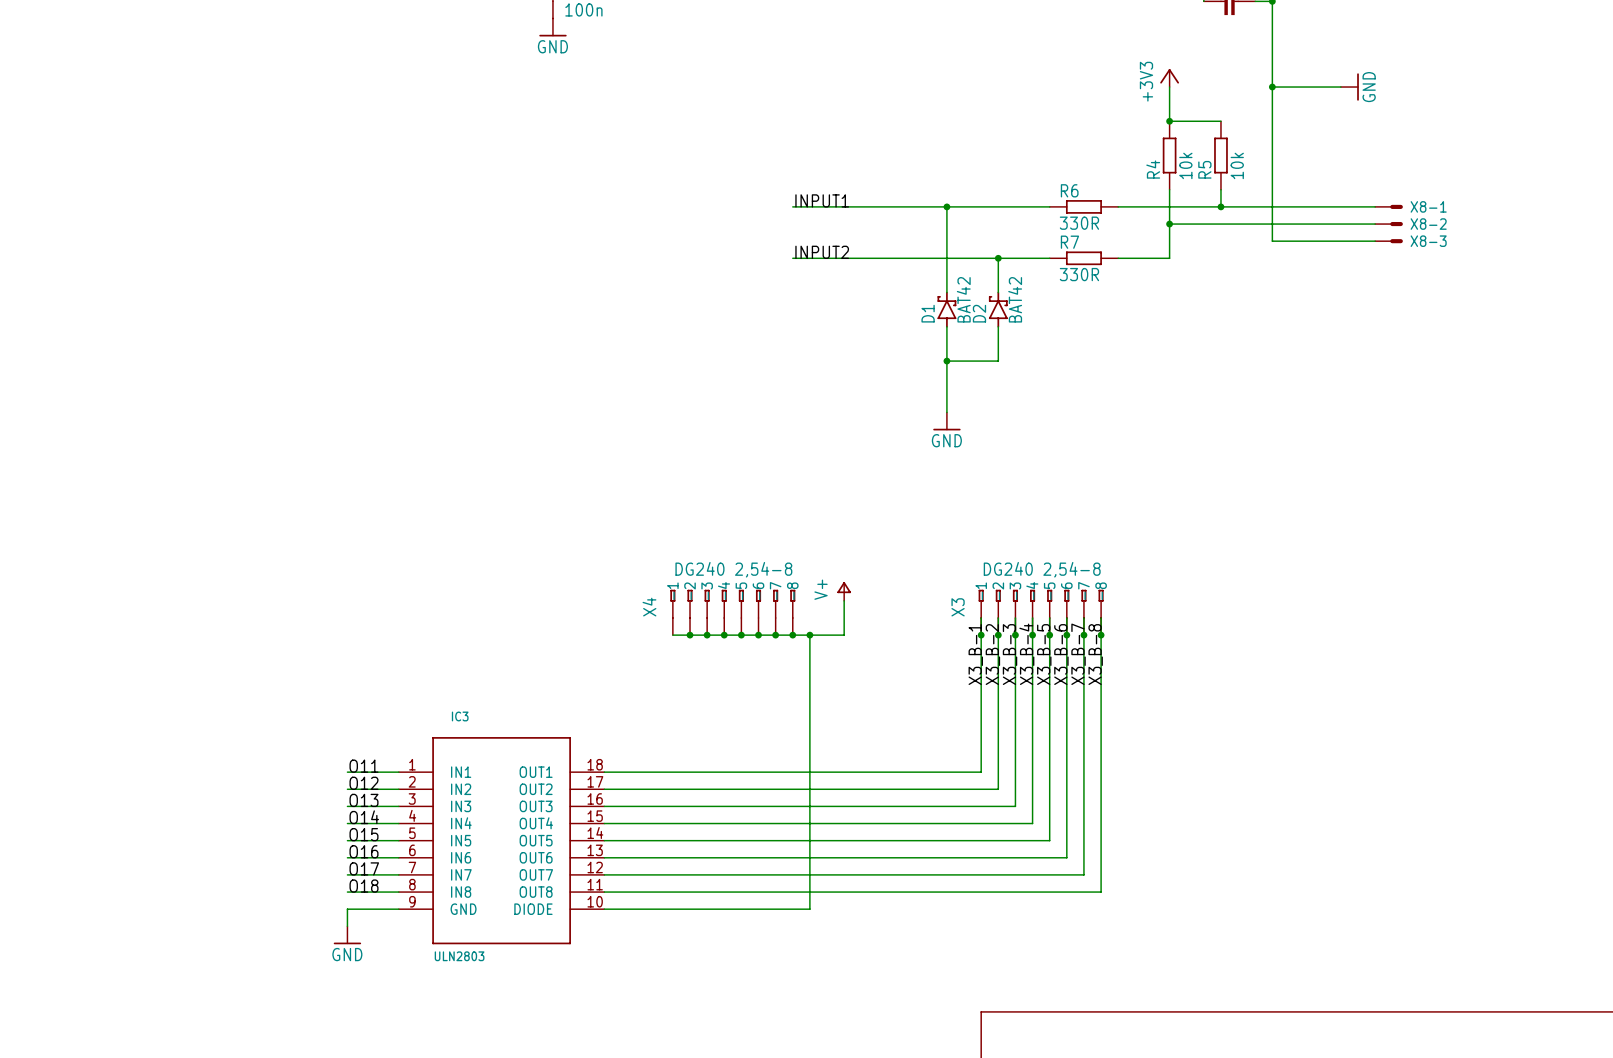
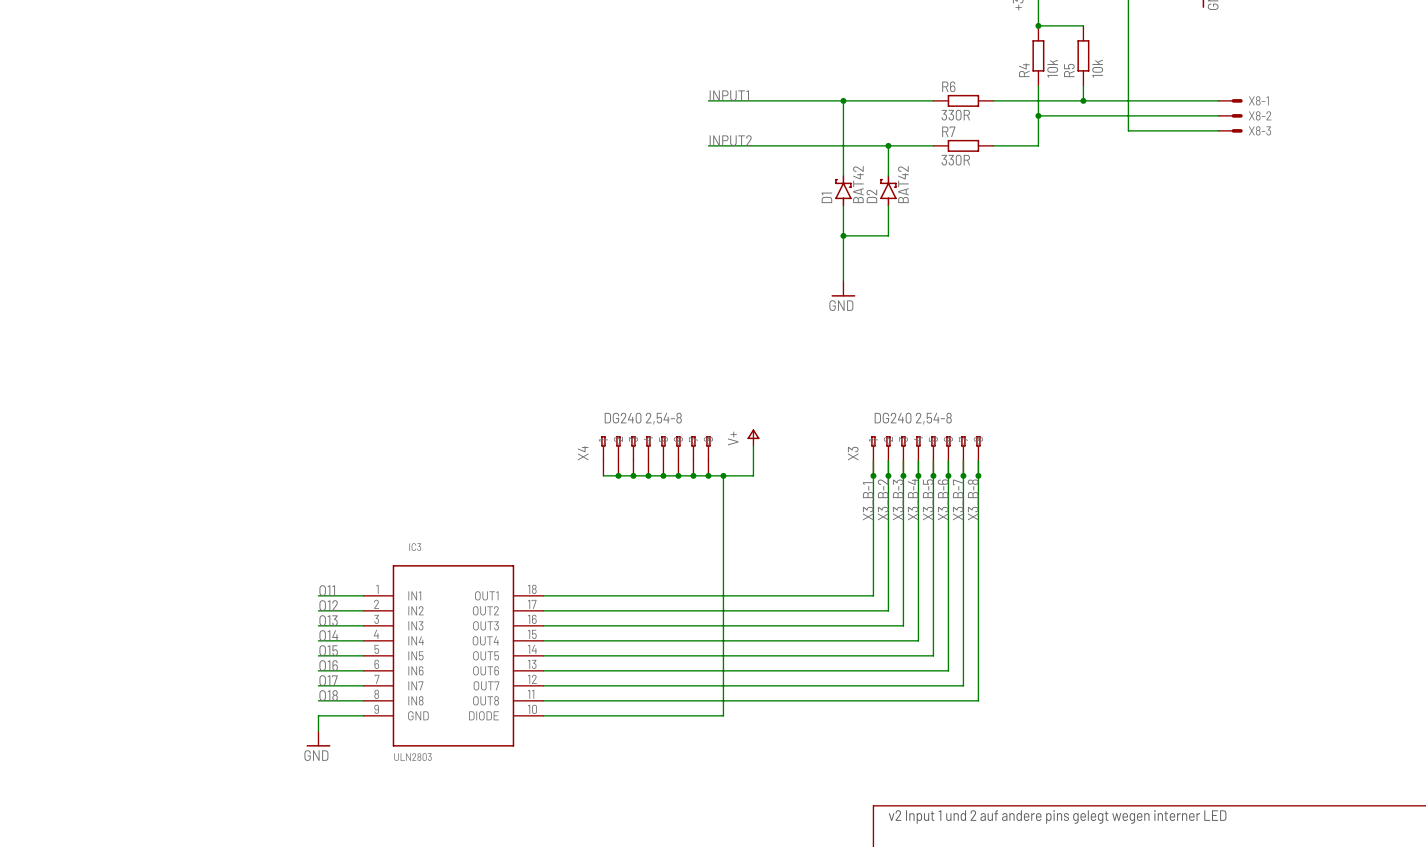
text: none -> v2 Input 1 und 2 auf andere pins gelegt wegen interner LED (1057, 817)

